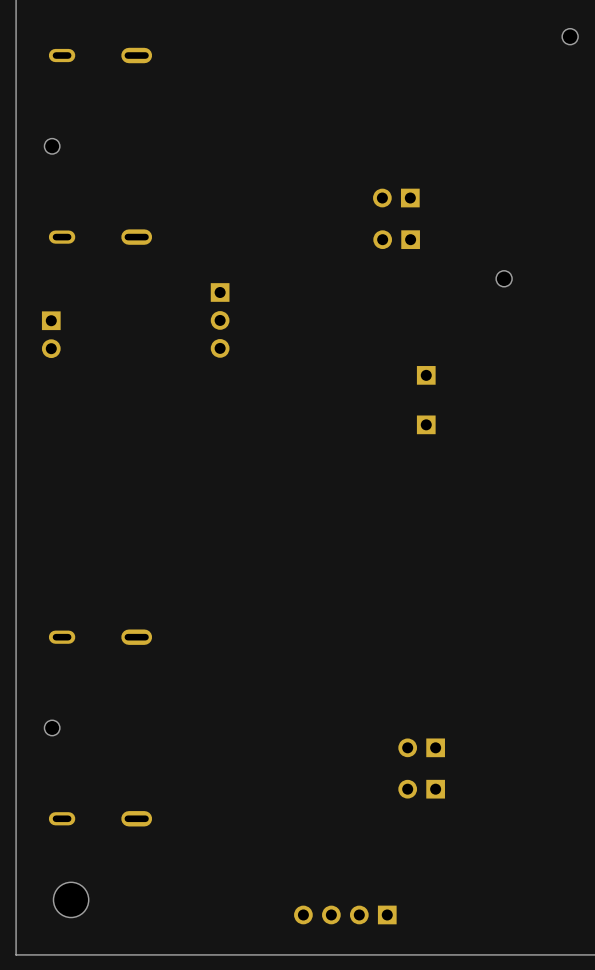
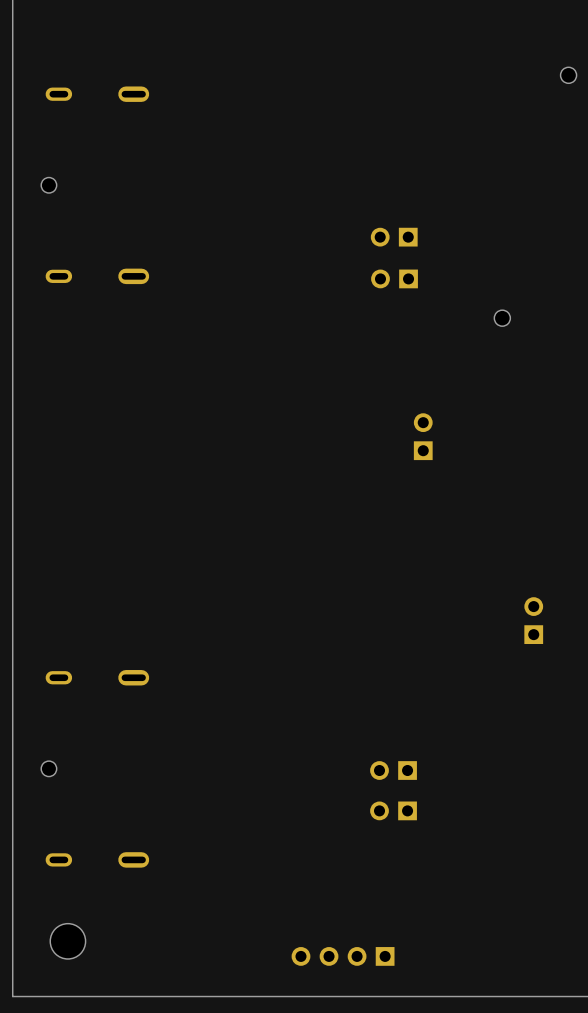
part: (220, 320) -> none
part: (51, 334) -> none
part: (426, 375) -> none
part: none -> (423, 436)
part: (426, 424) -> none
part: none -> (533, 620)
part: none -> (393, 770)
part: (421, 747) -> none
part: none -> (393, 810)
part: (421, 789) -> none

